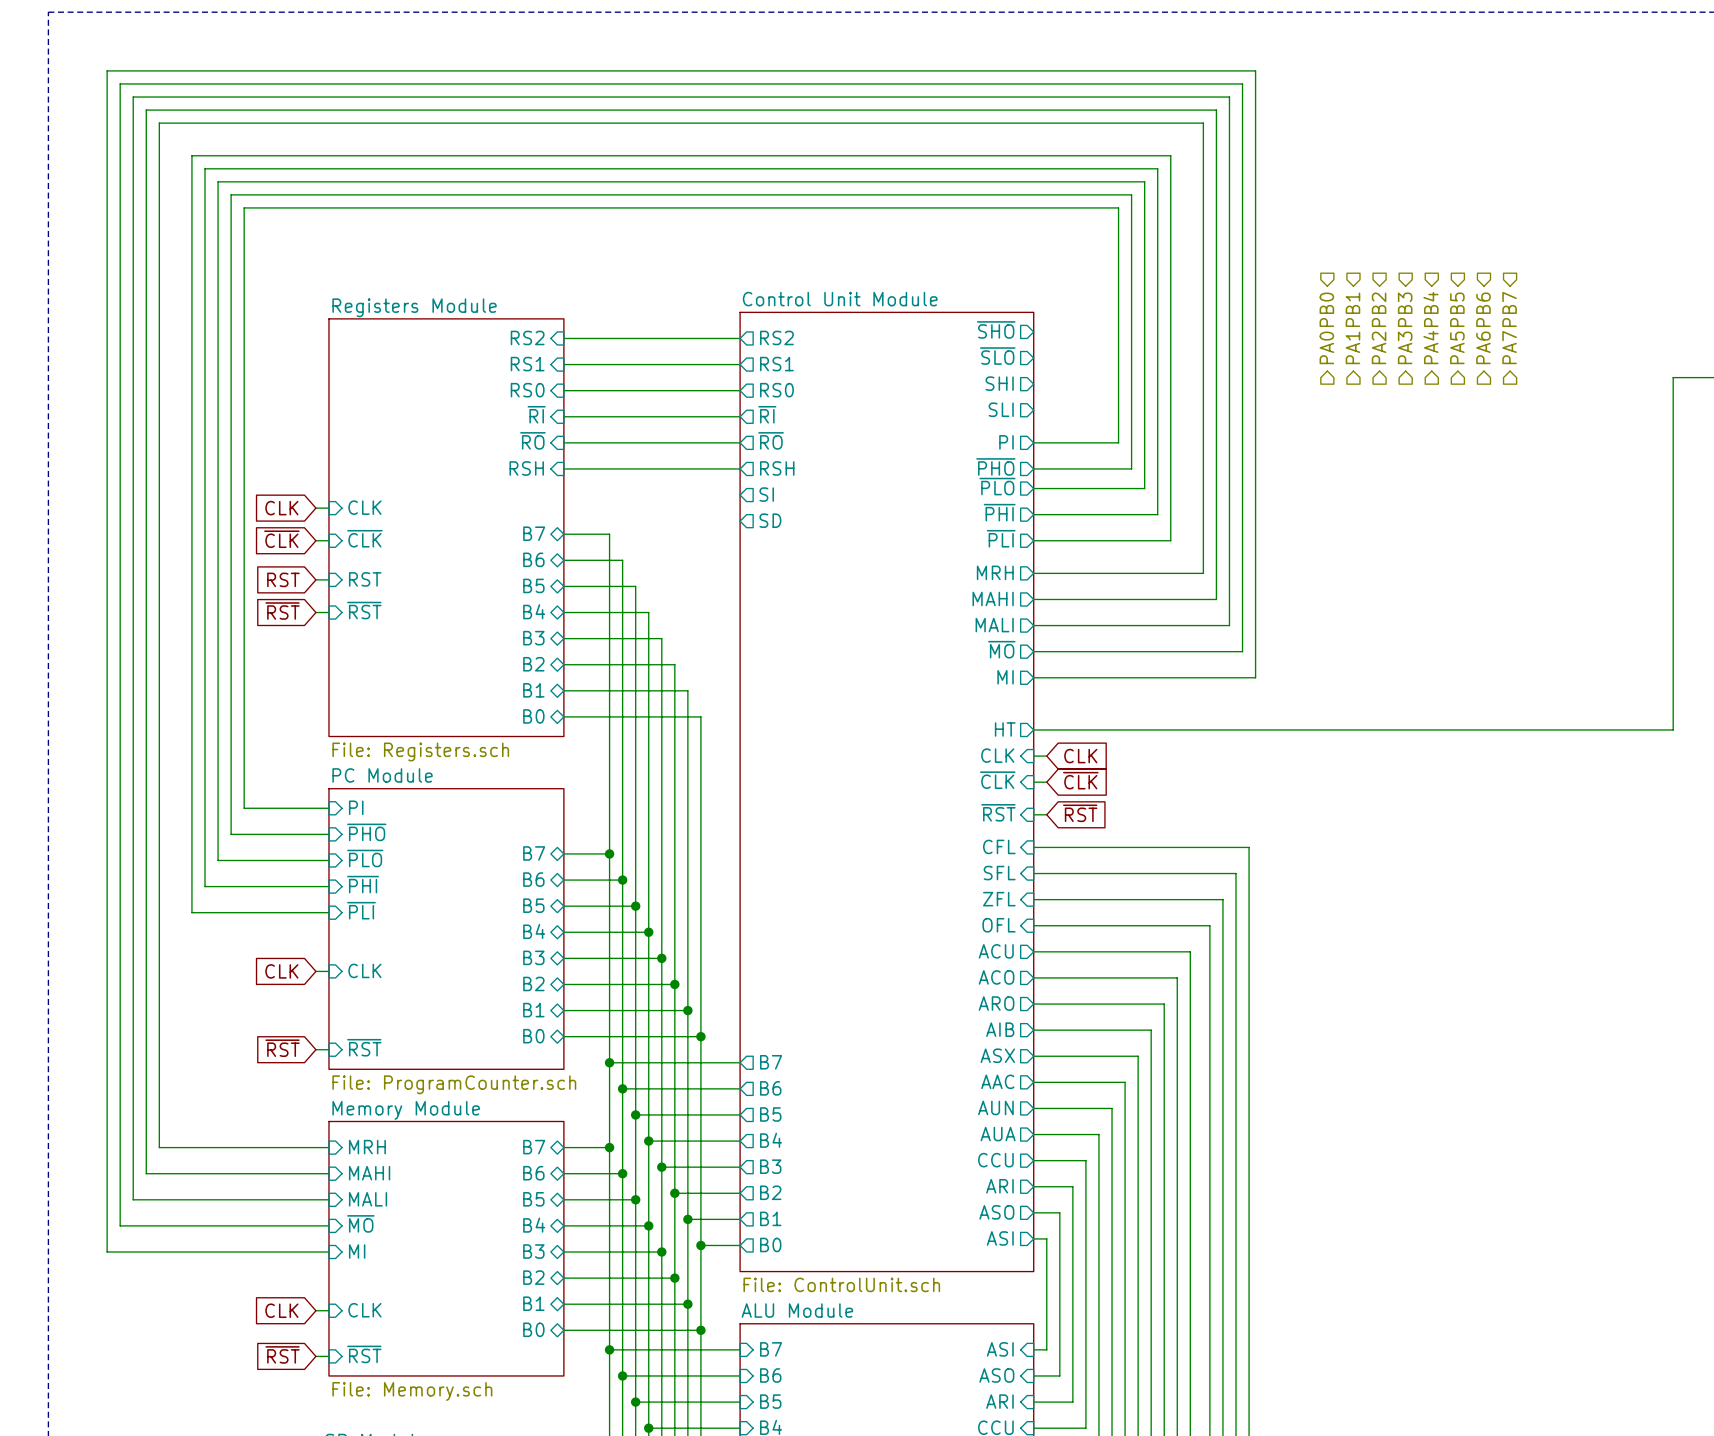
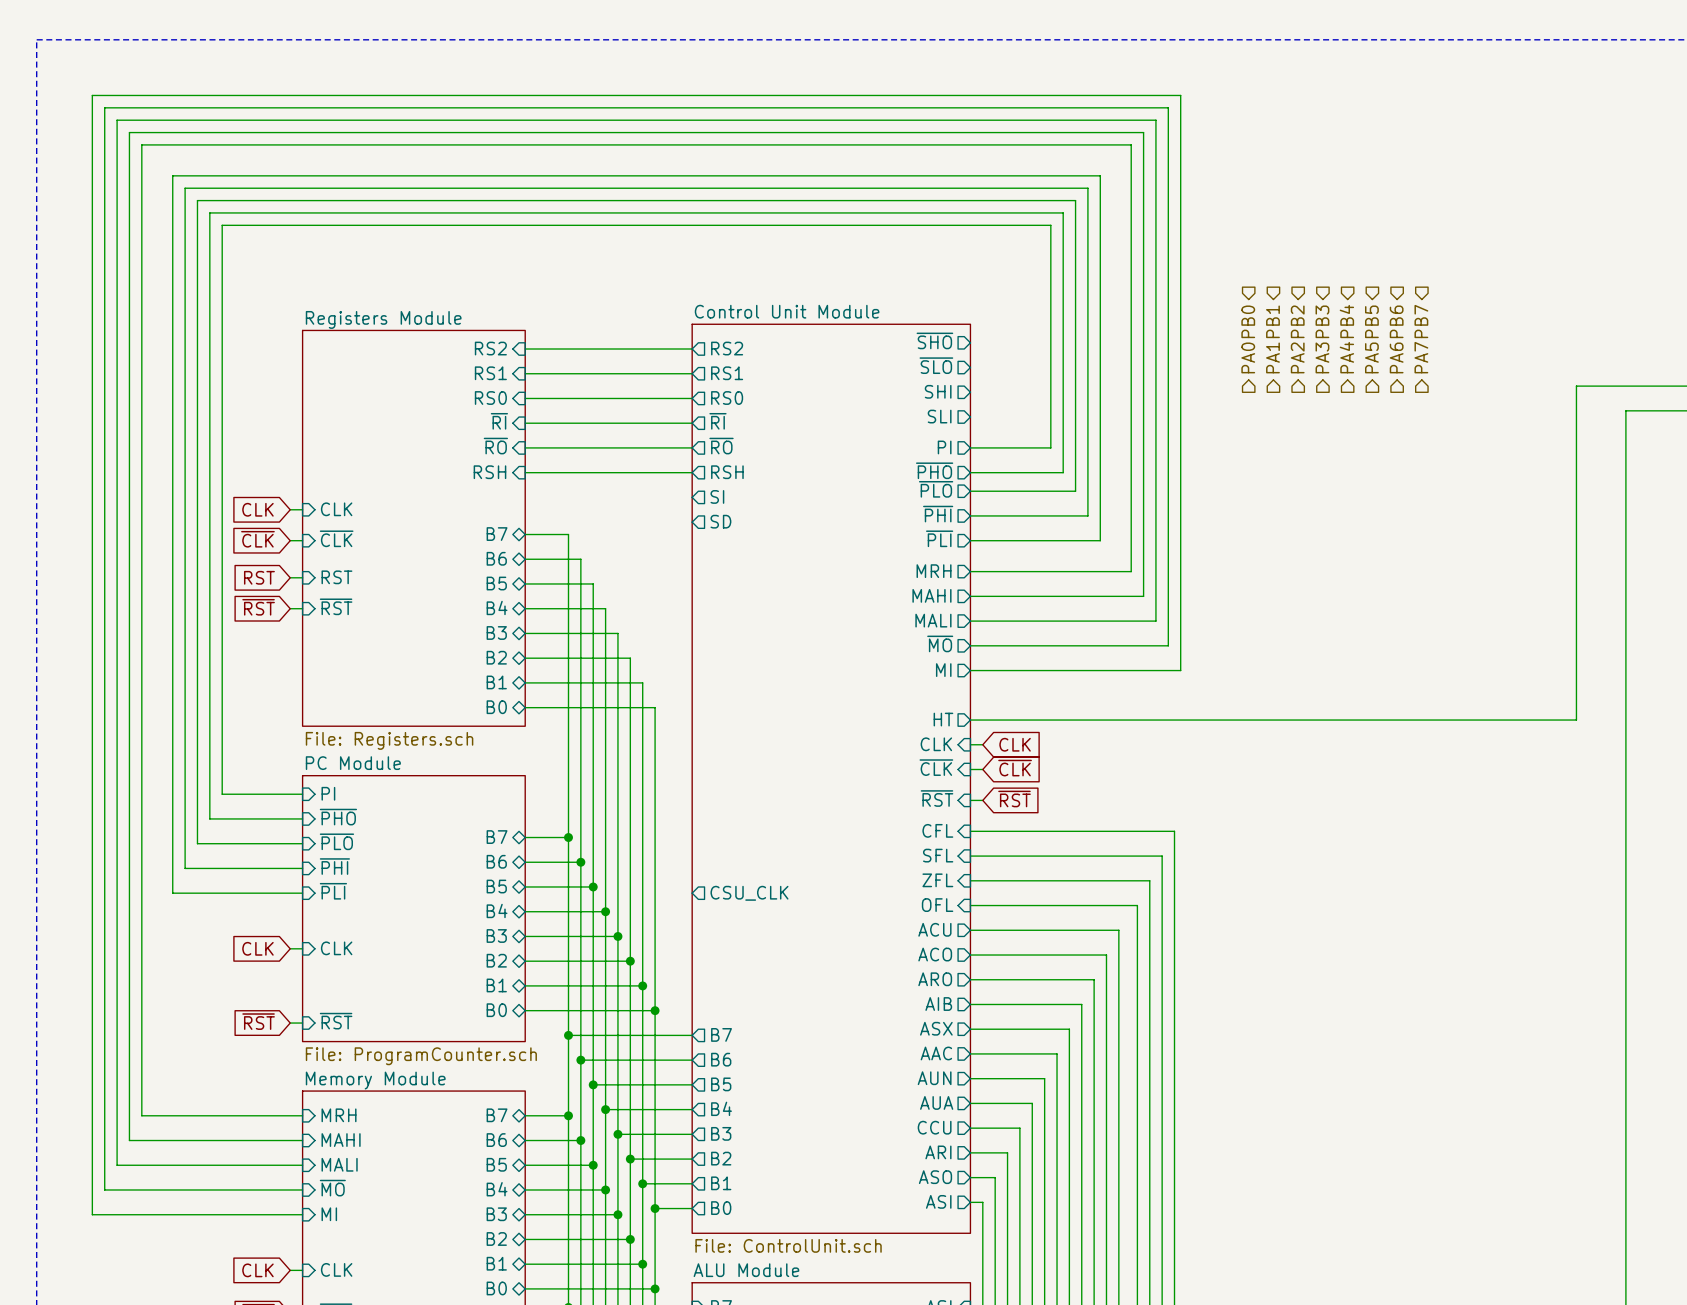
sheet pin: none -> CSU_CLK (749, 893)

